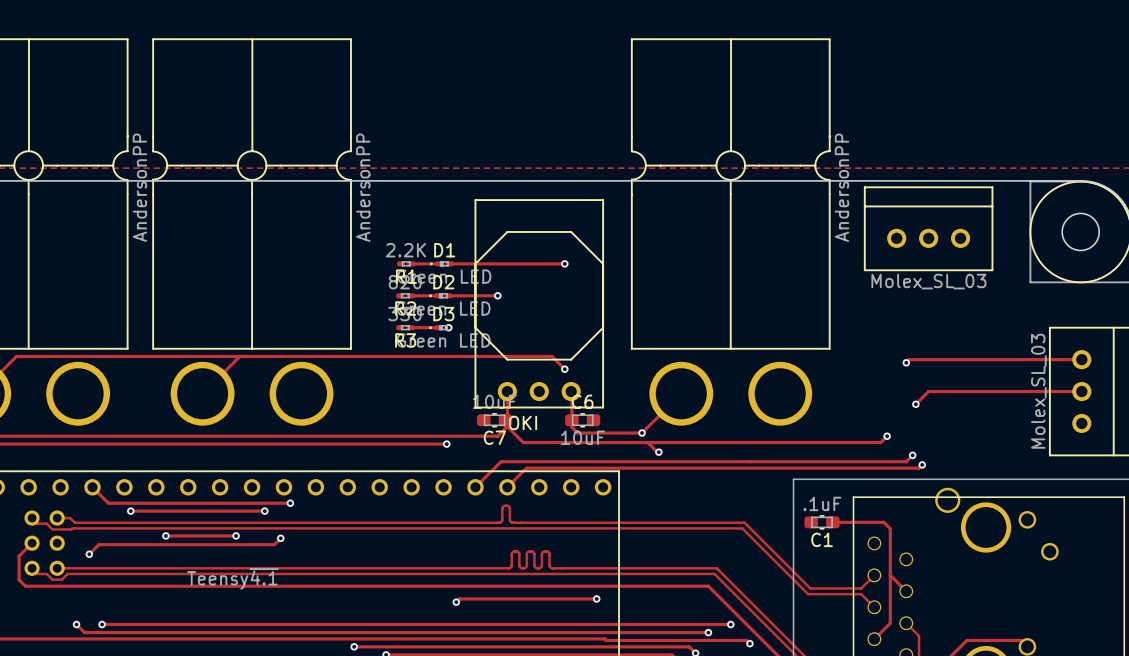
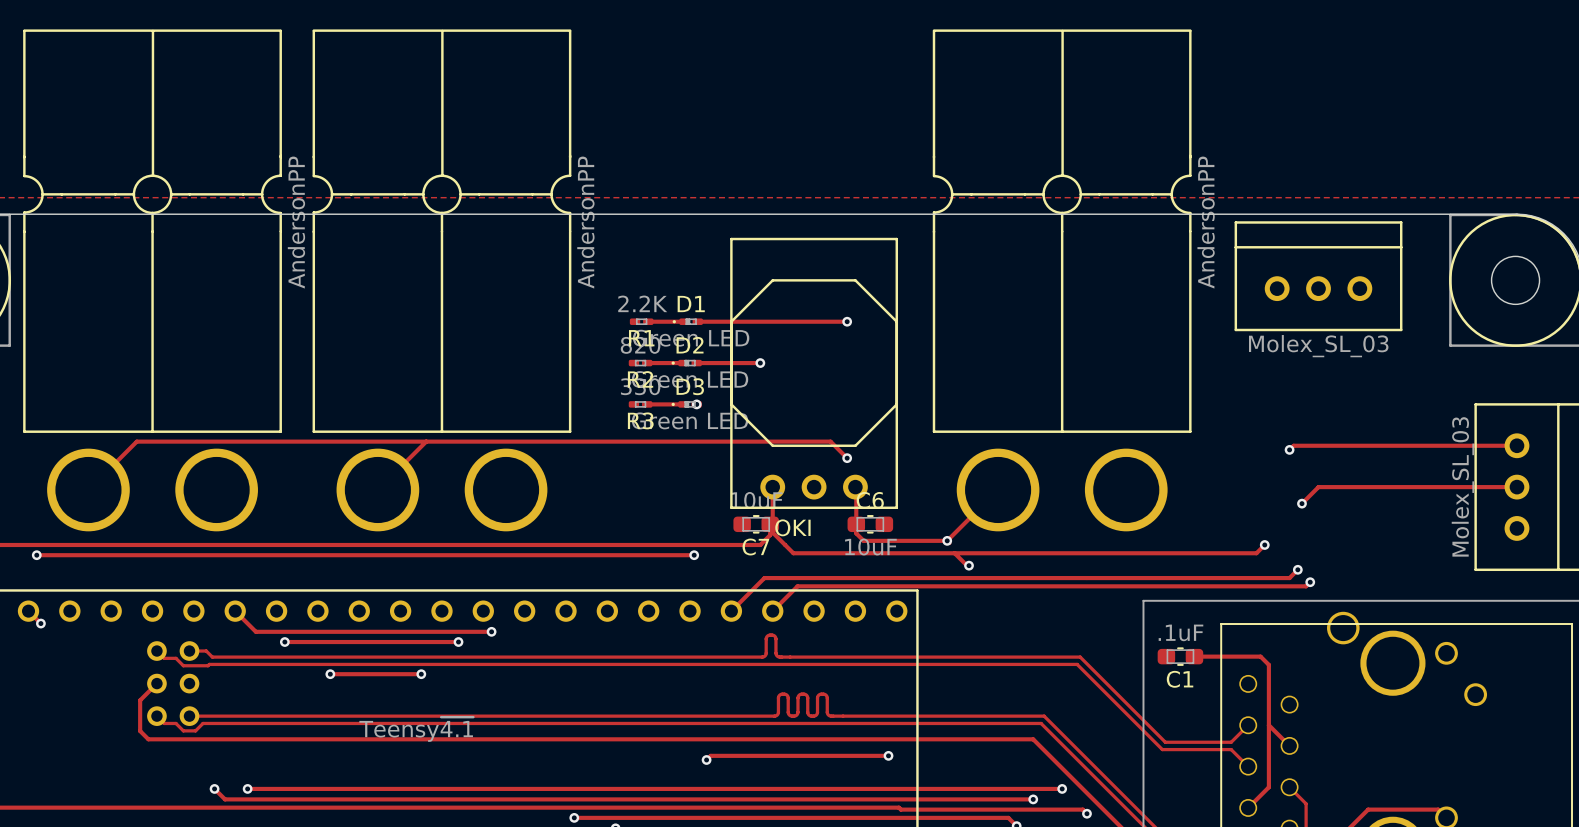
track: (280, 538) (274, 544) (98, 544) (89, 554) -> none
via: (280, 538) -> none
via: (89, 554) -> none

